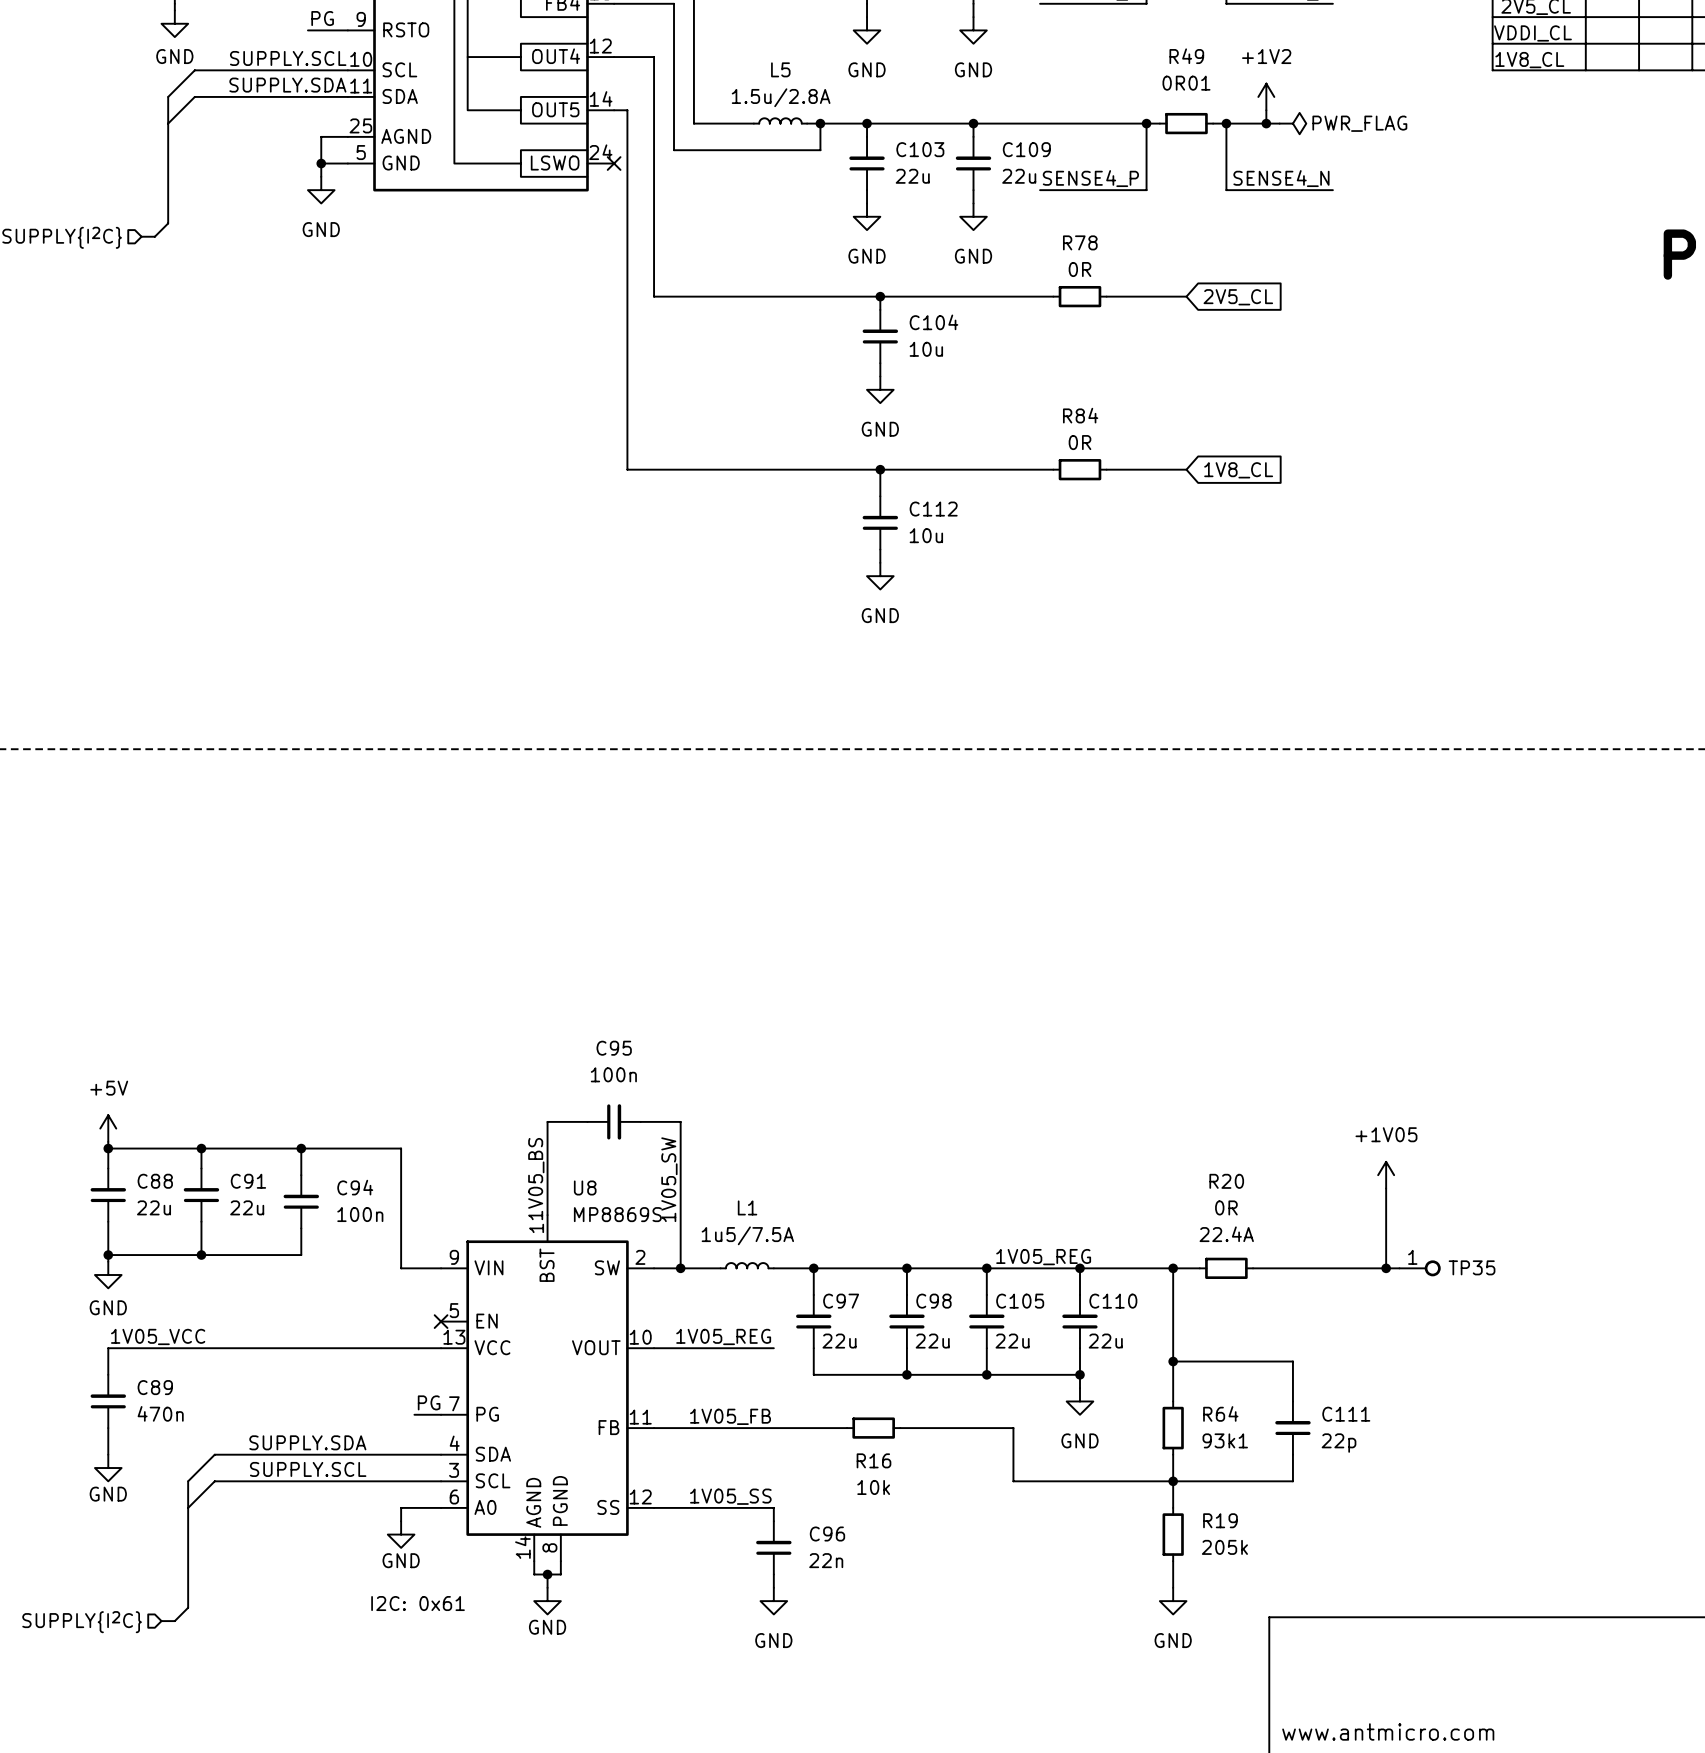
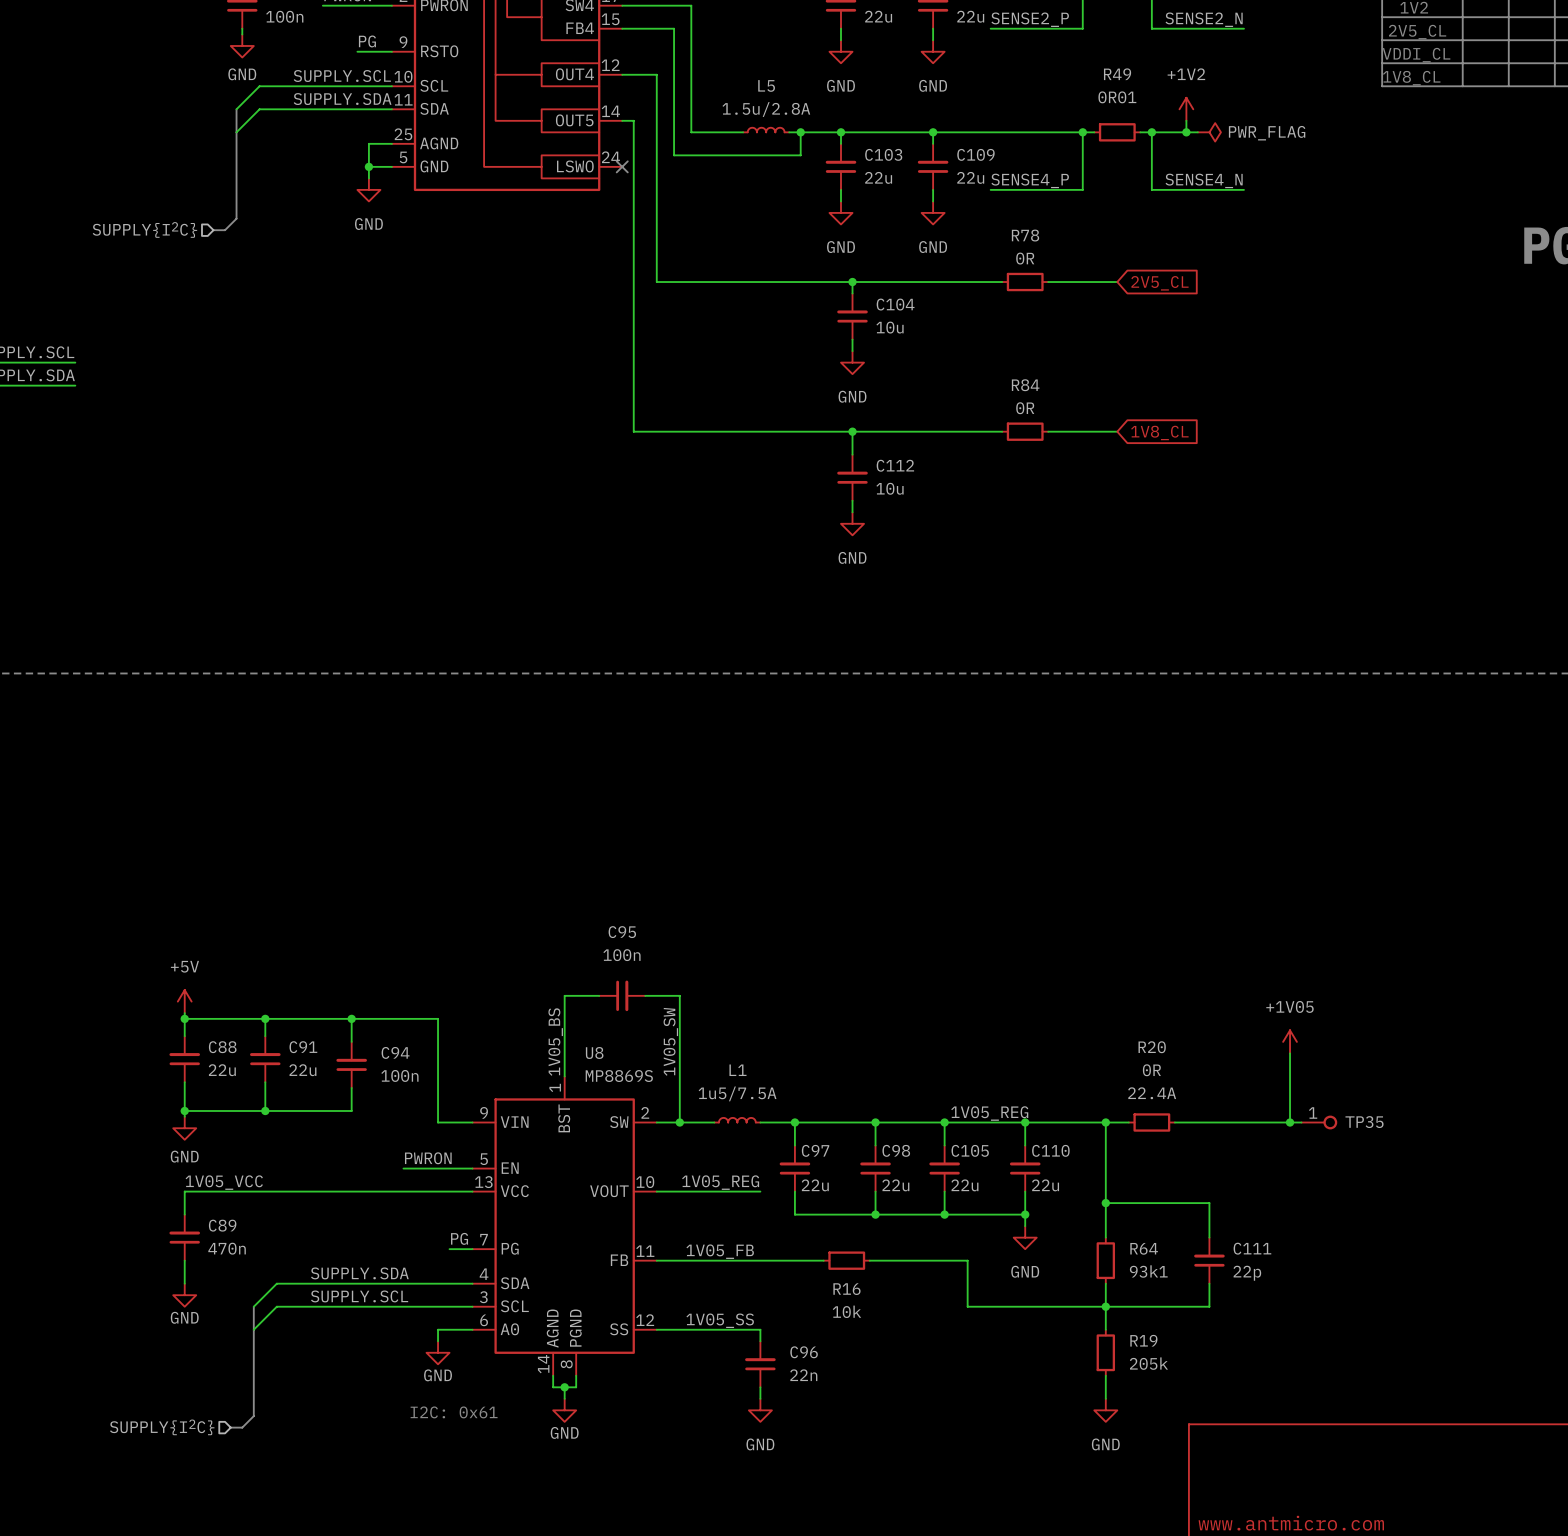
label: none -> PWRON (428, 1158)
wire: none -> (403, 1168) (472, 1168)
no-connect mark: (441, 1321) -> none

